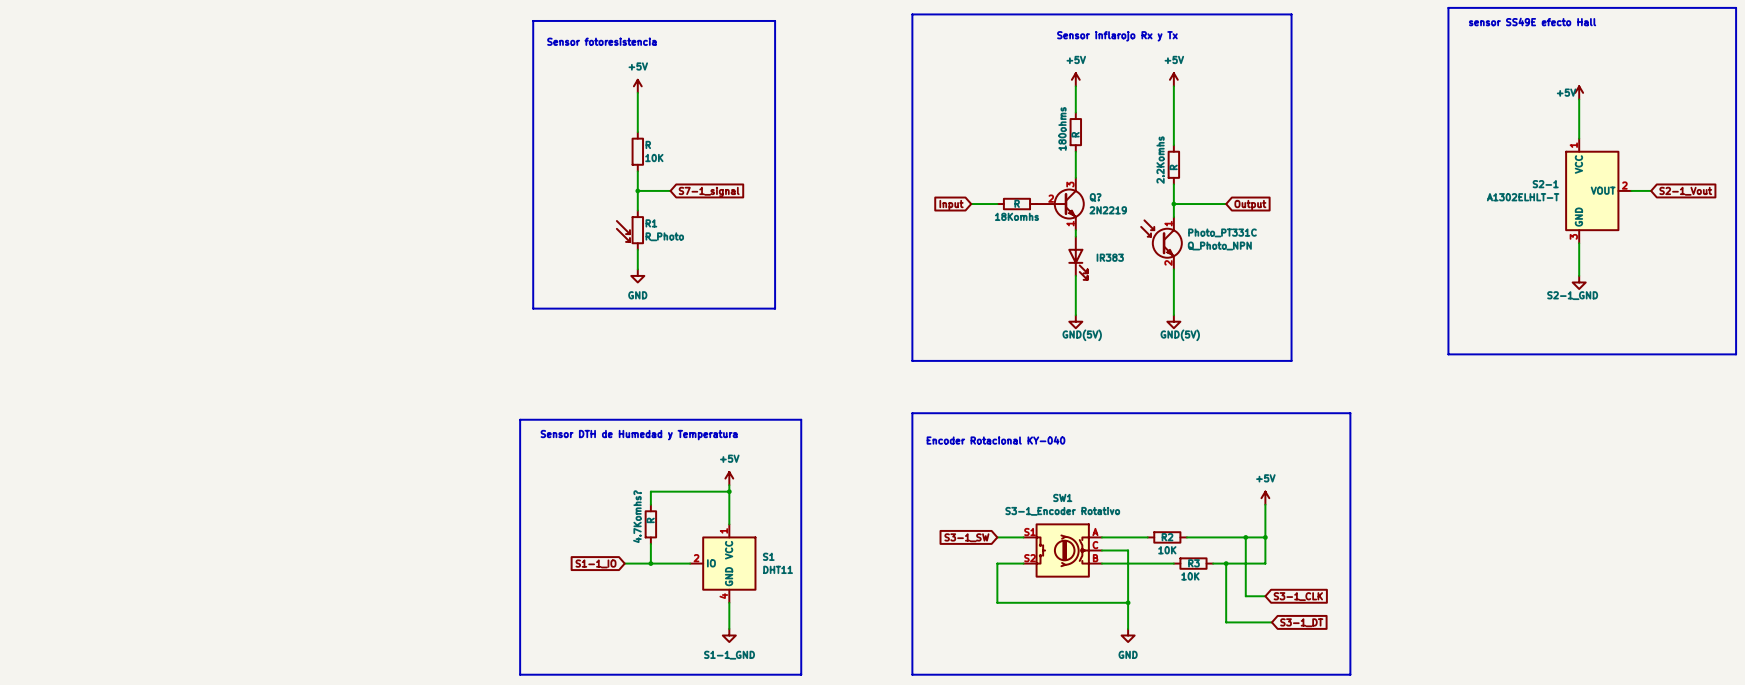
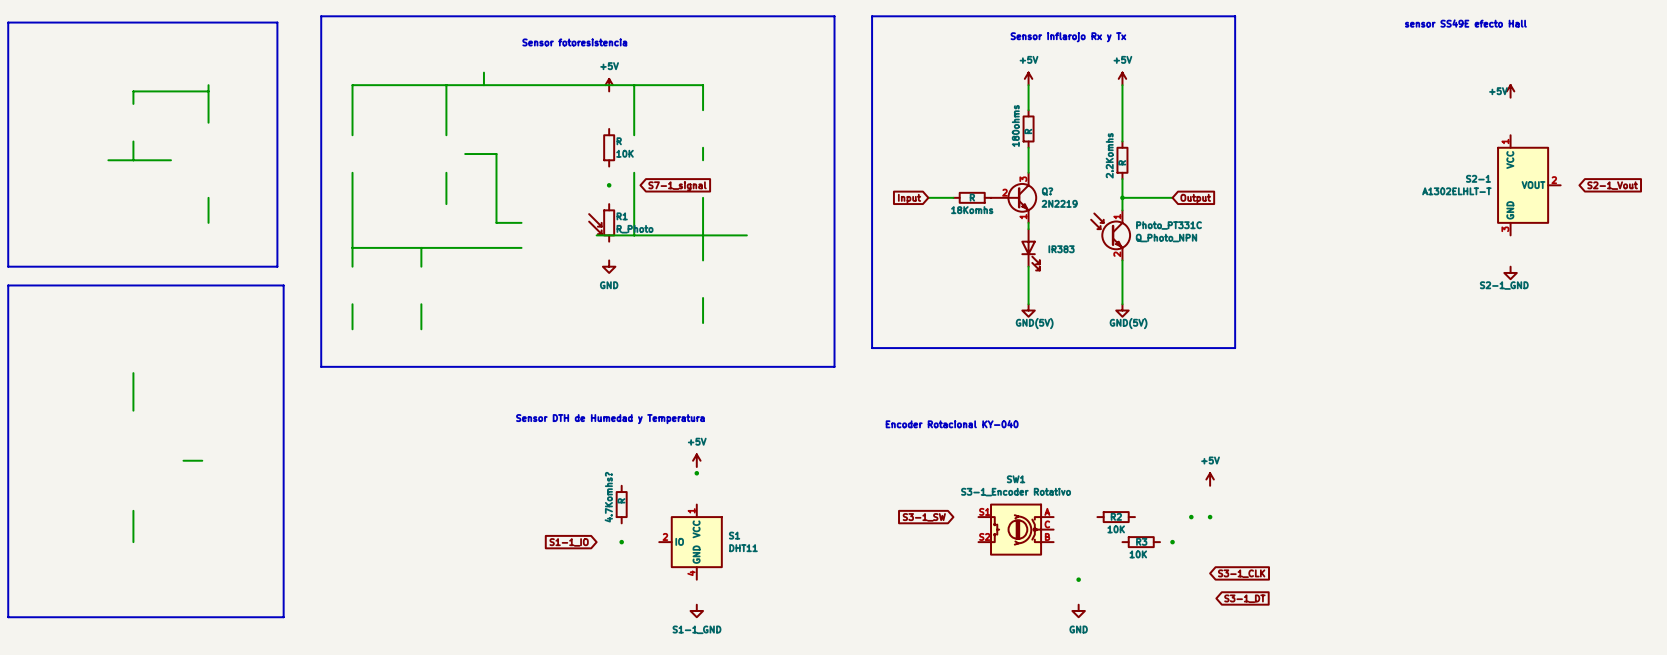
line: (1448, 7) (1448, 354) (1736, 354) (1736, 7) (1448, 7) -> none
line: none -> (321, 16) (321, 366) (834, 366) (834, 16) (321, 16)
line: none -> (8, 22) (8, 266) (277, 266) (277, 22) (8, 22)
line: (533, 20) (533, 308) (775, 308) (775, 20) (533, 20) -> none
wire: none -> (483, 72) (483, 85)
wire: none -> (208, 85) (208, 122)
wire: none -> (446, 85) (446, 135)
wire: none -> (634, 85) (634, 135)
wire: none -> (208, 91) (133, 91) (133, 103)
wire: (637, 92) (637, 132) -> none
wire: (1579, 99) (1579, 138) -> none
wire: none -> (703, 110) (703, 85) (352, 85) (352, 135)
wire: none -> (133, 141) (133, 160)
wire: none -> (703, 147) (703, 160)
wire: none -> (465, 154) (496, 154) (496, 222) (521, 222)
wire: none -> (108, 160) (170, 160)
wire: (637, 171) (637, 210) -> none
wire: none -> (352, 172) (352, 266)
wire: none -> (446, 172) (446, 204)
wire: none -> (634, 172) (634, 235)
wire: (637, 190) (670, 190) -> none
wire: (1631, 190) (1651, 190) -> none
wire: none -> (208, 197) (208, 222)
wire: none -> (703, 197) (703, 260)
wire: none -> (596, 235) (746, 235)
wire: (1579, 243) (1579, 275) -> none
wire: (637, 249) (637, 269) -> none
wire: none -> (352, 247) (521, 247)
wire: none -> (421, 247) (421, 266)
line: none -> (8, 285) (8, 617) (283, 617) (283, 285) (8, 285)
wire: none -> (703, 297) (703, 323)
wire: none -> (352, 304) (352, 329)
wire: none -> (421, 304) (421, 329)
wire: none -> (133, 373) (133, 410)
line: (912, 413) (912, 674) (1350, 674) (1350, 413) (912, 413) -> none
line: (520, 419) (520, 674) (801, 674) (801, 419) (520, 419) -> none
wire: none -> (183, 460) (202, 460)
wire: (729, 485) (729, 524) -> none
wire: (729, 491) (650, 491) (650, 504) -> none
wire: (1265, 504) (1265, 563) (1213, 563) -> none
wire: none -> (133, 510) (133, 542)
wire: (997, 537) (1023, 537) -> none
wire: (1101, 537) (1147, 537) -> none
wire: (1186, 537) (1265, 537) -> none
wire: (1245, 537) (1245, 596) (1265, 596) -> none
wire: (650, 543) (650, 563) -> none
wire: (1101, 550) (1128, 550) (1128, 628) -> none
wire: (624, 563) (690, 563) -> none
wire: (1023, 563) (997, 563) (997, 602) (1128, 602) -> none
wire: (1101, 563) (1173, 563) -> none
wire: (1226, 563) (1226, 622) (1271, 622) -> none
wire: (729, 602) (729, 628) -> none

